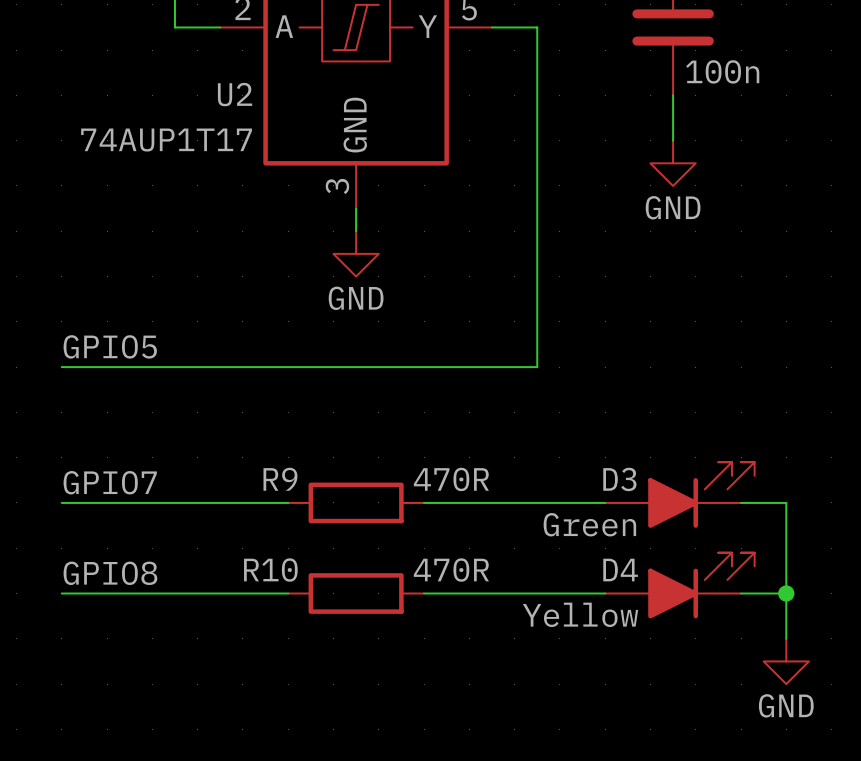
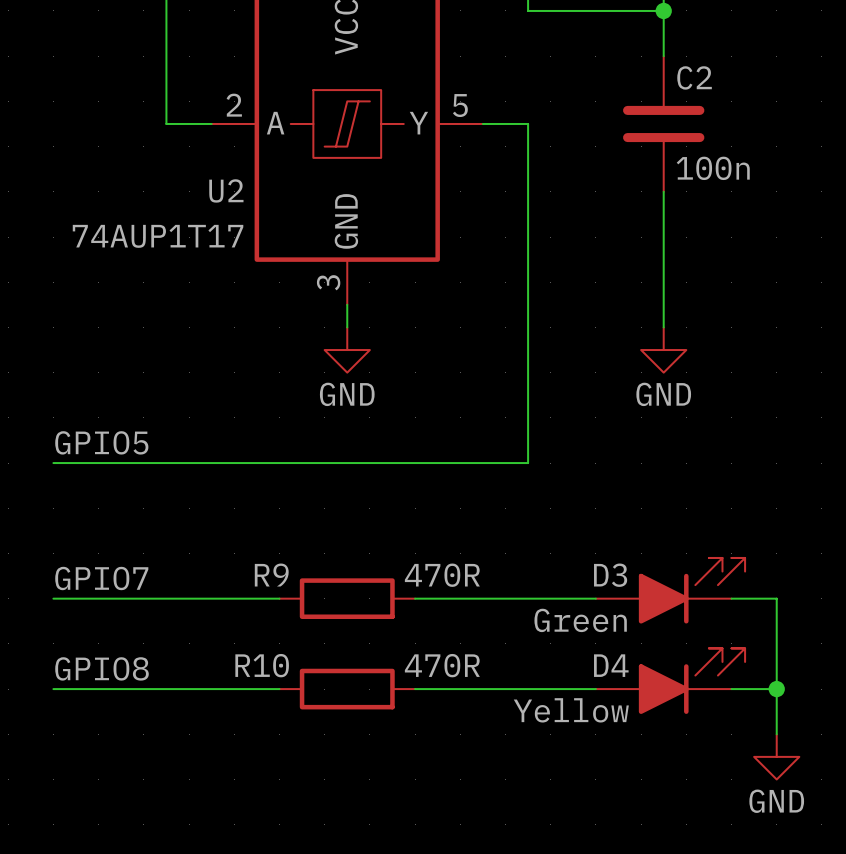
wire: none -> (663, 237) (663, 327)
power symbol position: GND (673, 163) -> GND (663, 350)

